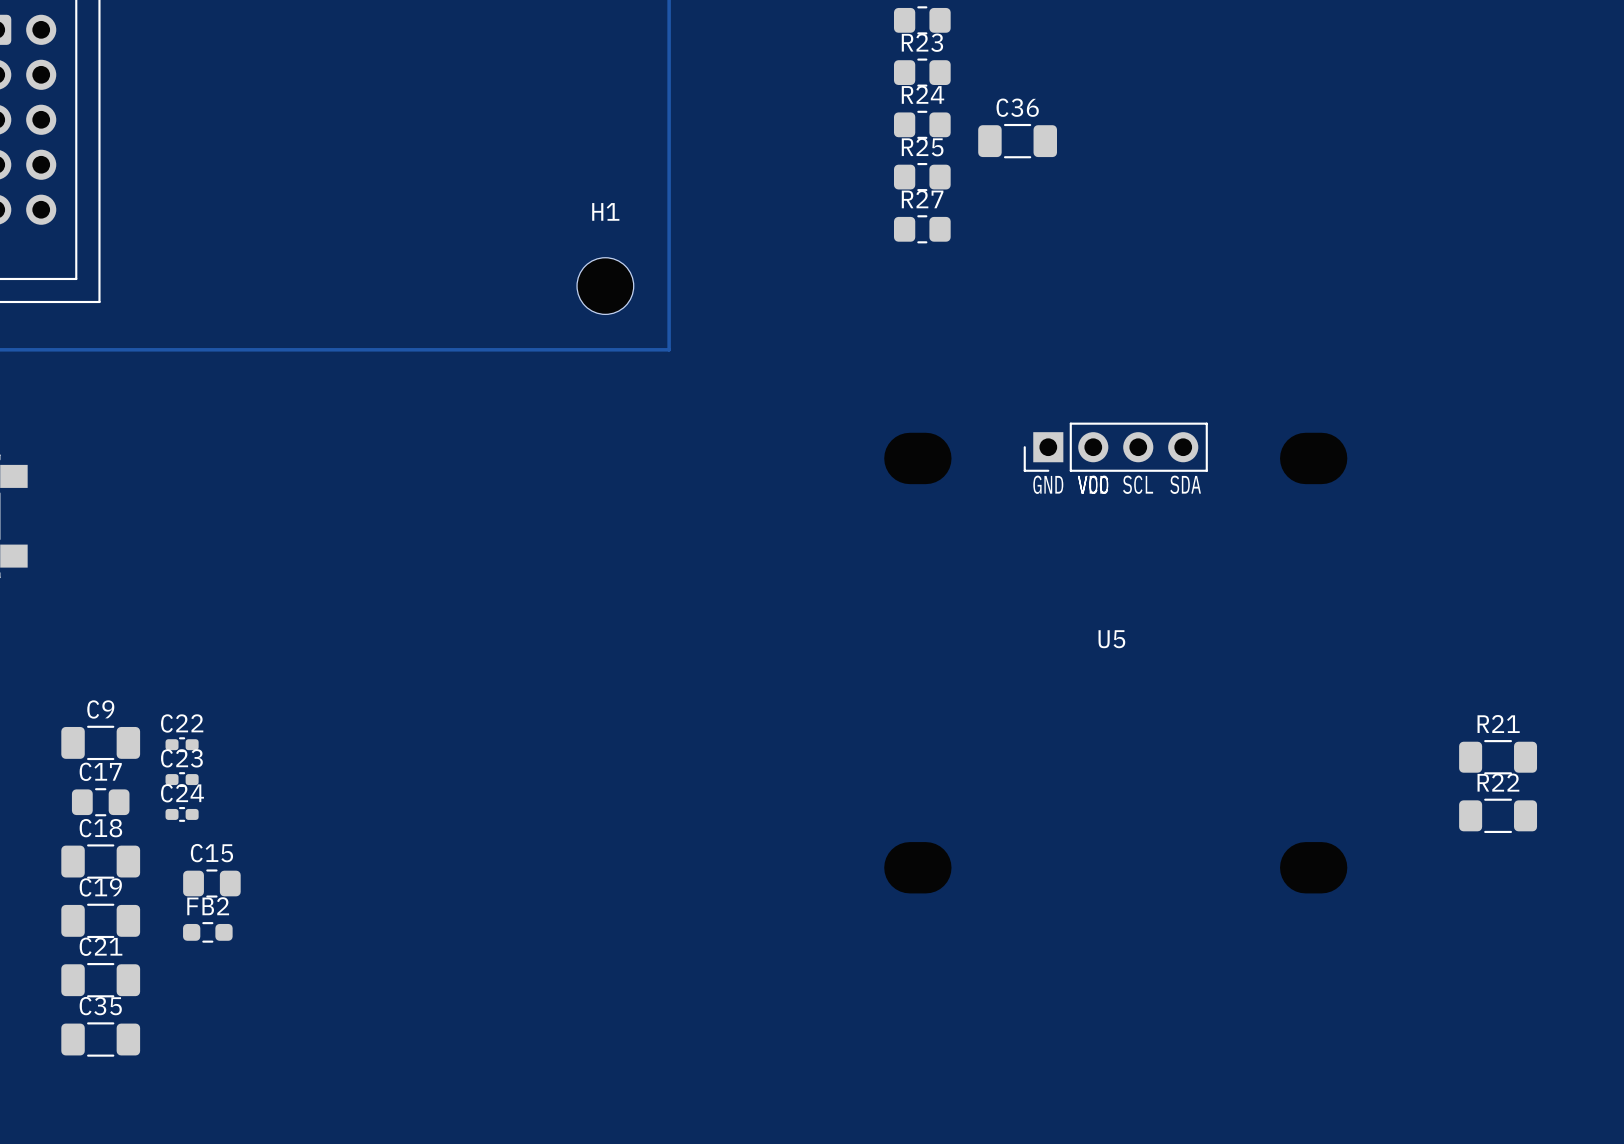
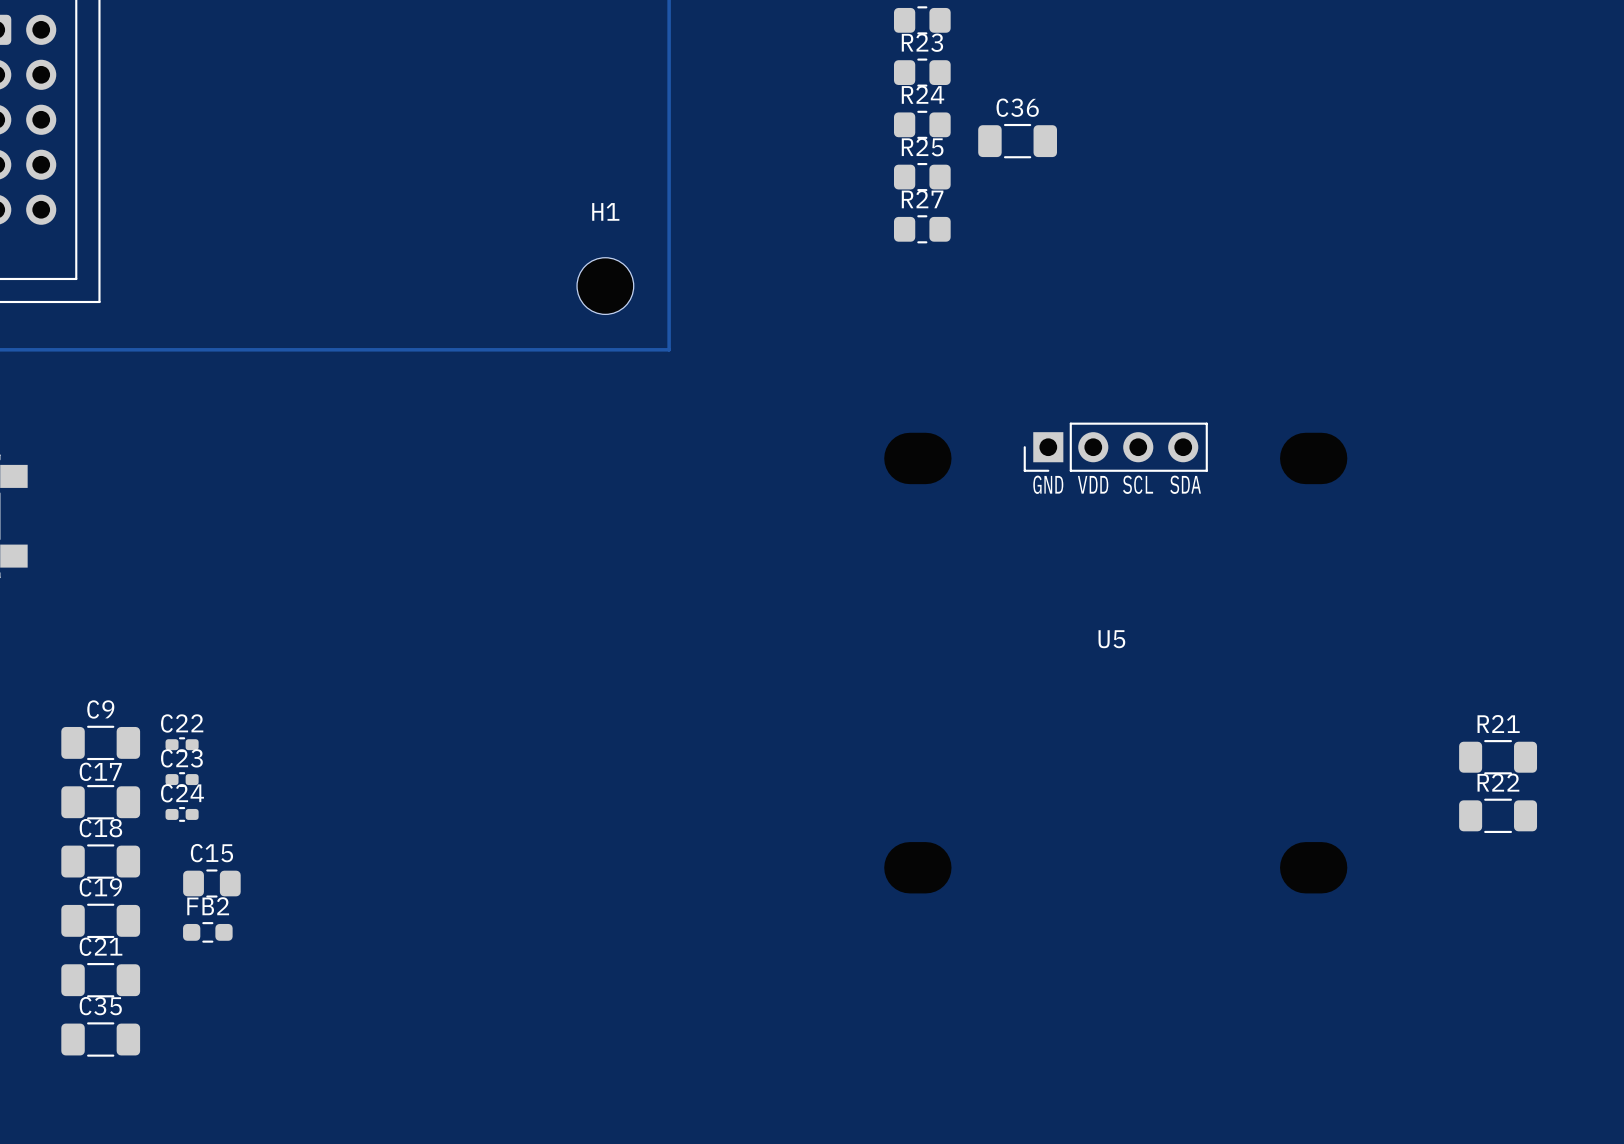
U5 footprint: [884, 422, 1348, 894] -> [884, 422, 1348, 894]
C17 footprint: [71, 788, 130, 817] -> [61, 785, 141, 820]

